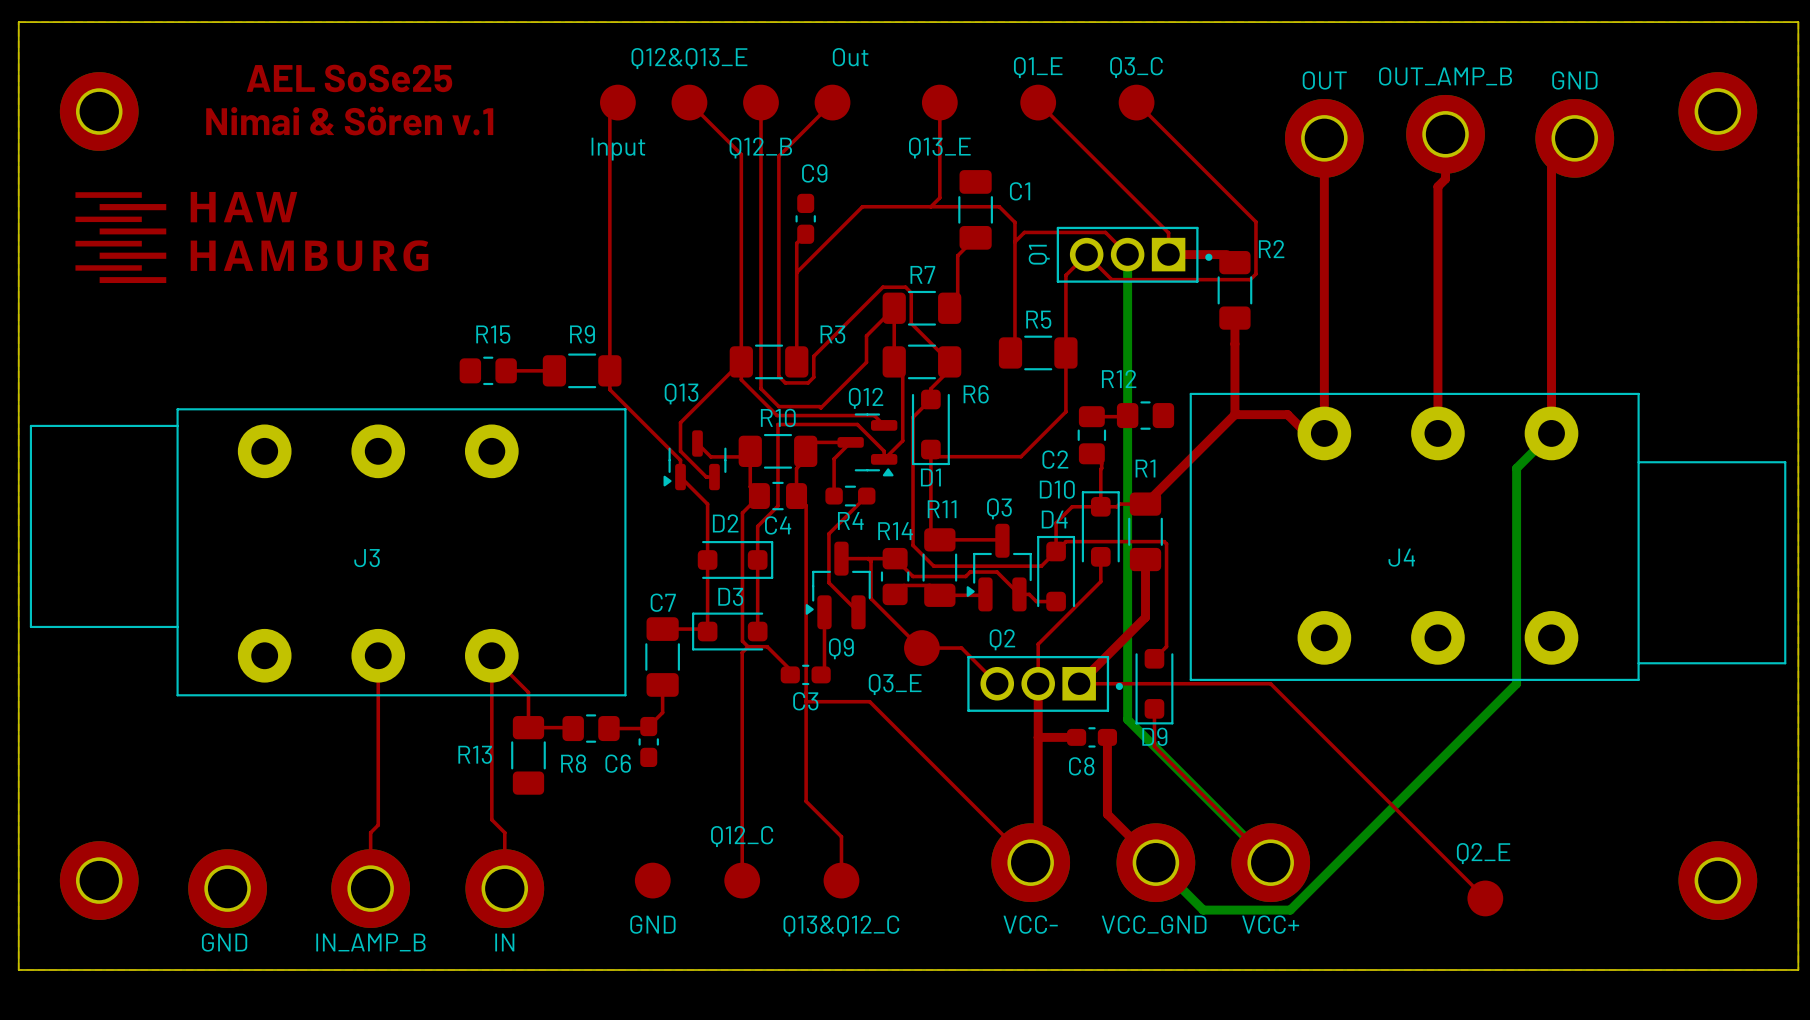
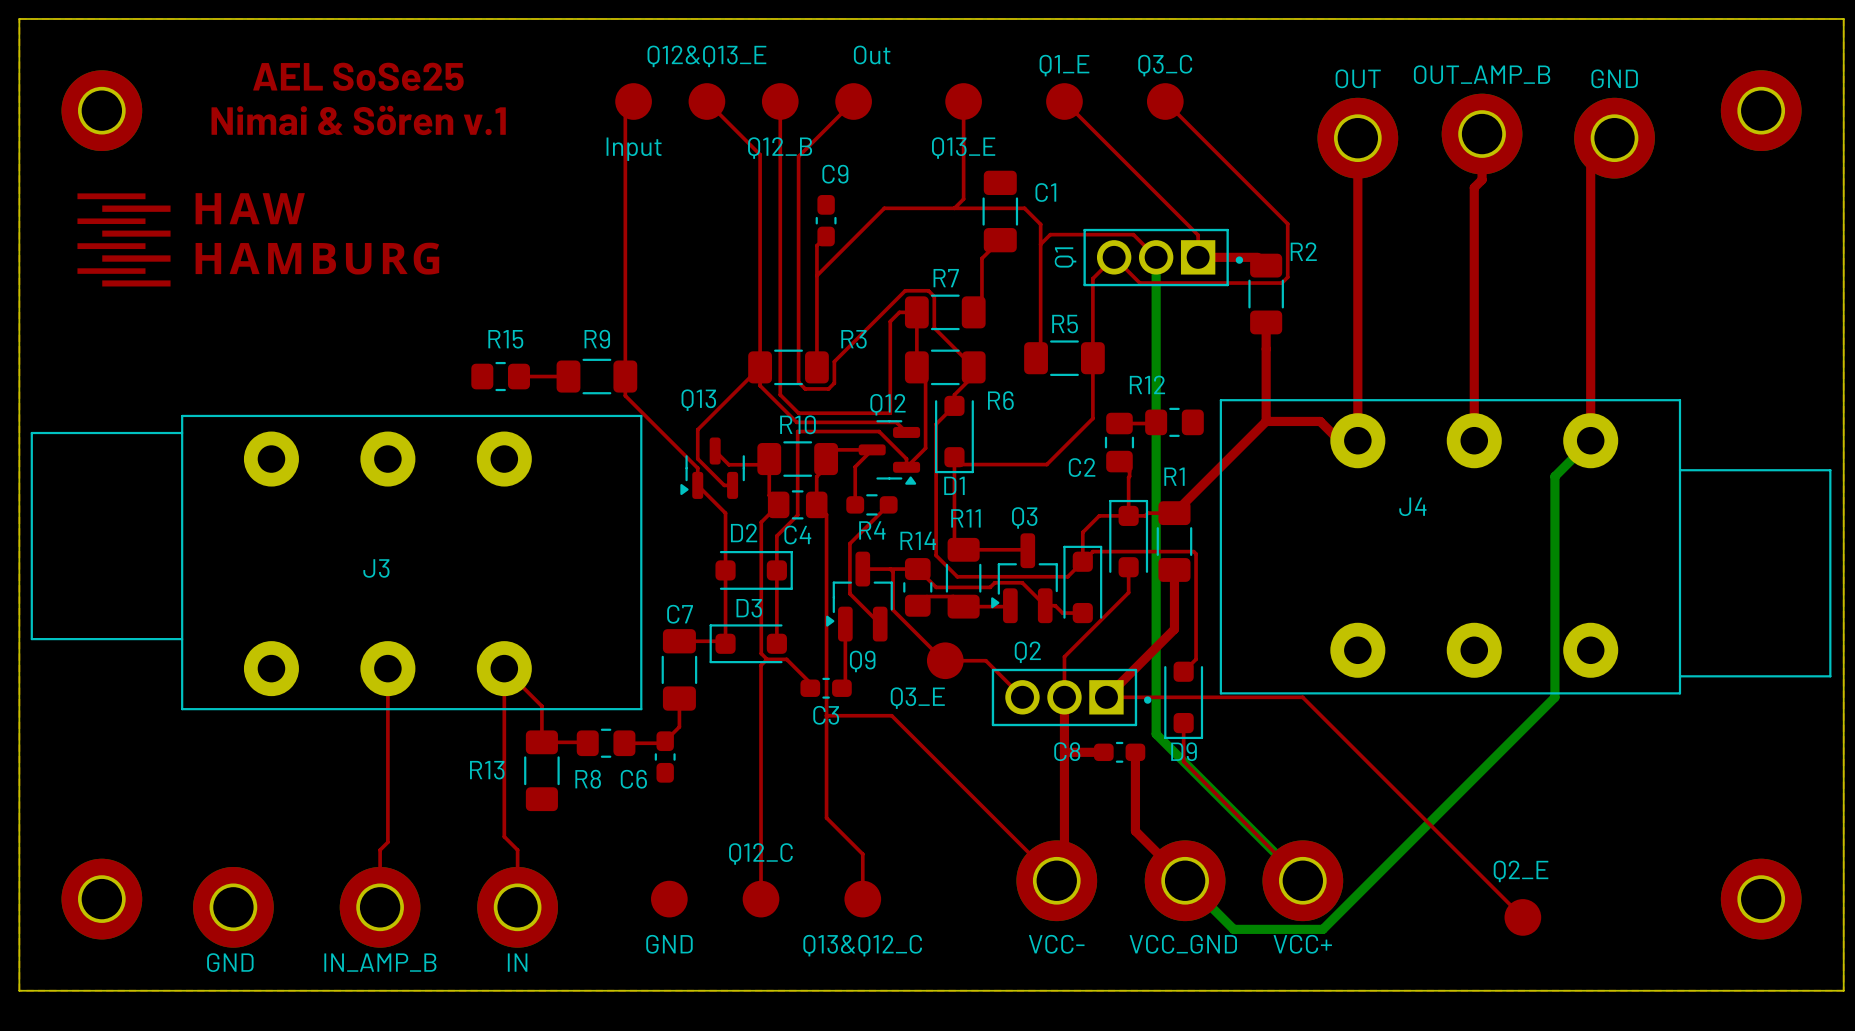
top track: (894, 308) (866, 335) (866, 362) (820, 407) (819, 406) -> (916, 312) (899, 312) (890, 321) (890, 413) (840, 413)
text: D10 (1057, 489) -> none
text: D4 (1054, 519) -> none
J4 name position: J4 (1401, 557) -> J4 (1412, 506)
C8 name position: C8 (1081, 766) -> C8 (1067, 751)

